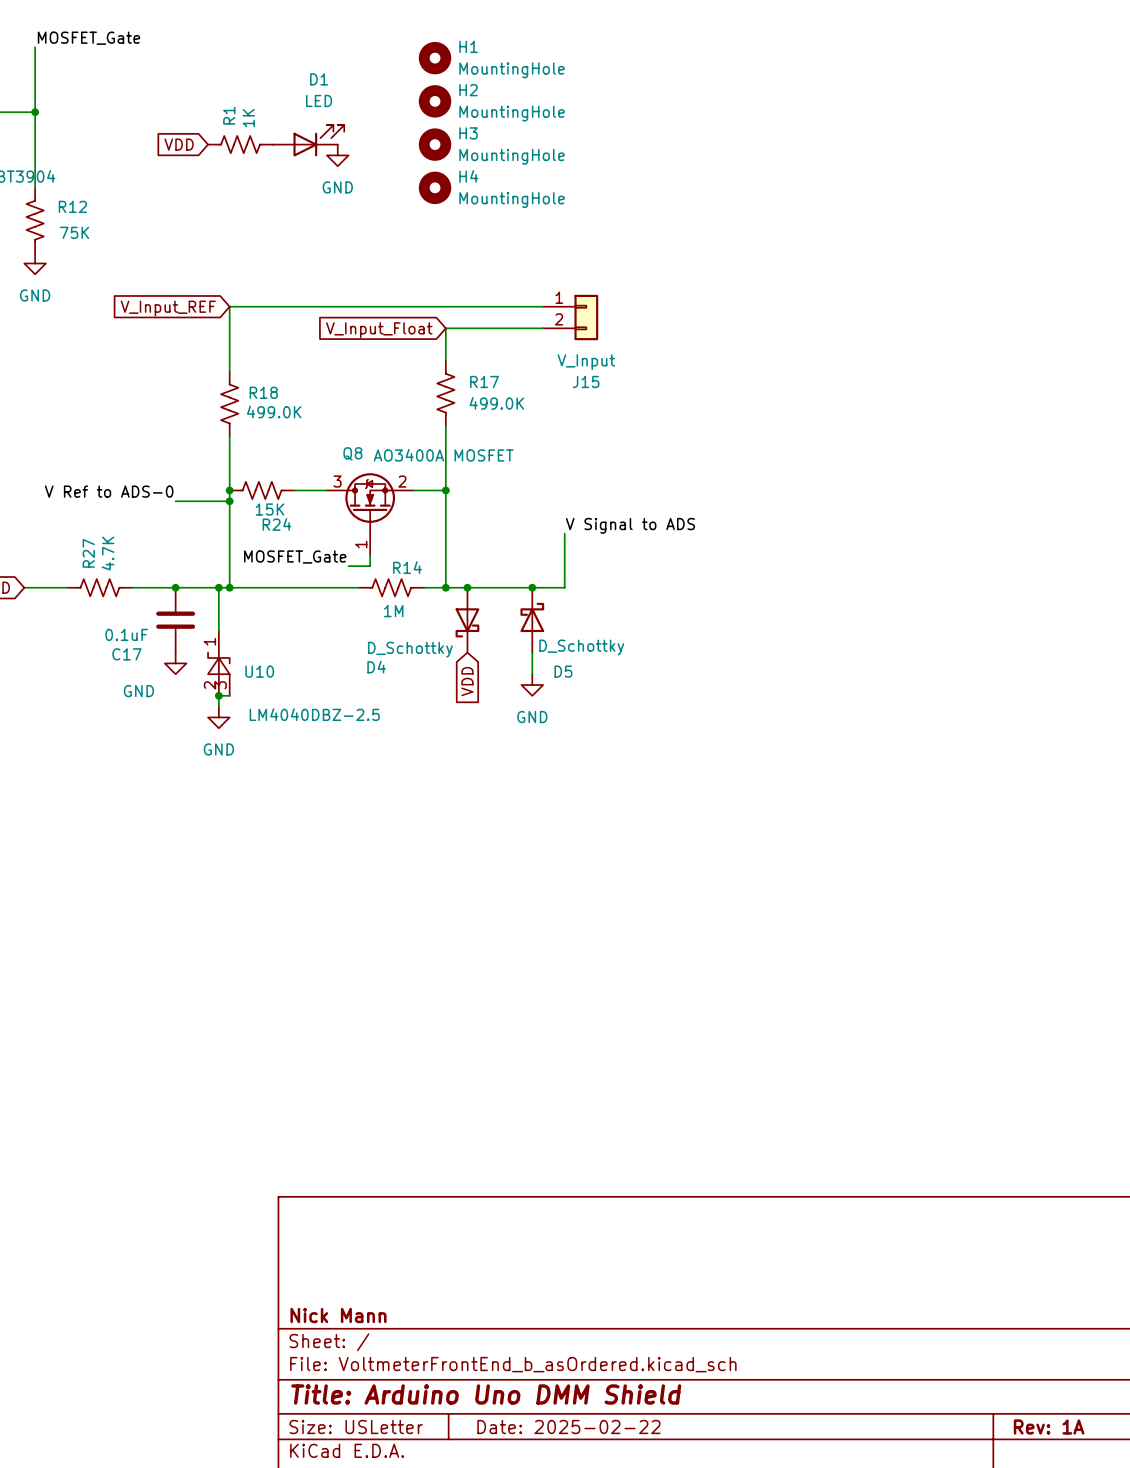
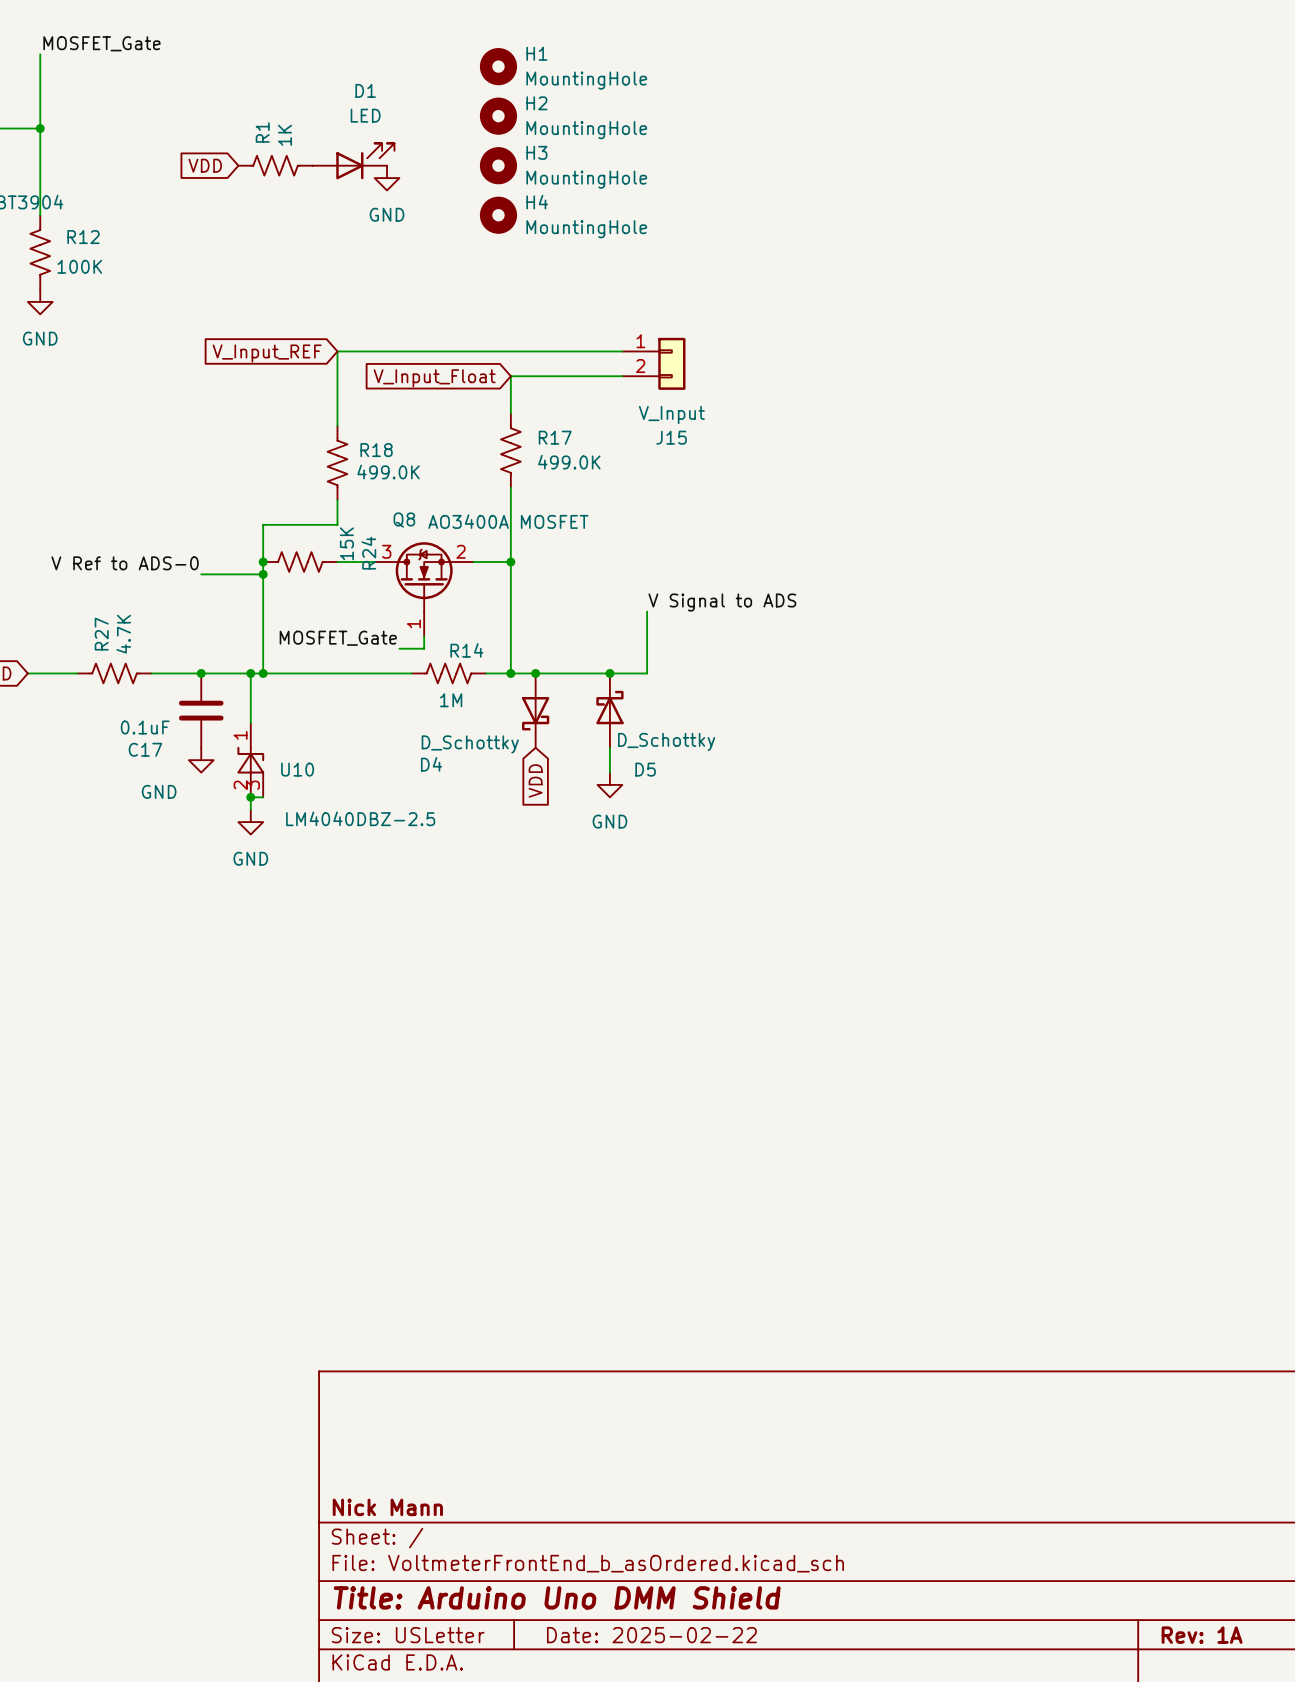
R12 value: 75K (74, 232) -> 100K (79, 266)
wire: (294, 306) (229, 306) (229, 371) -> (337, 351) (337, 425)
global label position: V_Input_REF (168, 308) -> V_Input_REF (267, 353)
R18 position: (229, 404) -> (337, 462)
wire: (229, 436) (229, 458) -> (337, 500) (337, 524) (263, 524)
R24 value rotation: 0° (270, 509) -> 90° counterclockwise (346, 543)
R24 value position: 15K (270, 509) -> 15K (346, 543)
R24 name rotation: 0° (277, 524) -> 90° counterclockwise (368, 553)
R24 name position: R24 (277, 524) -> R24 (368, 553)

